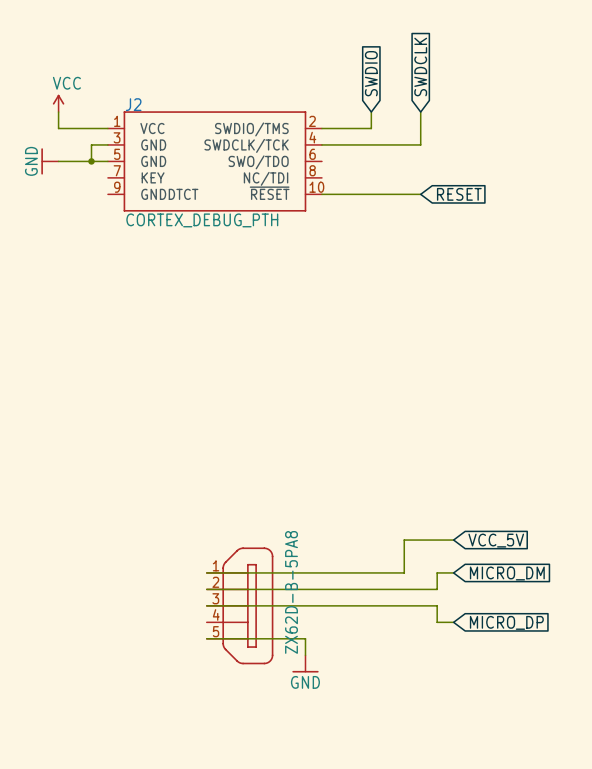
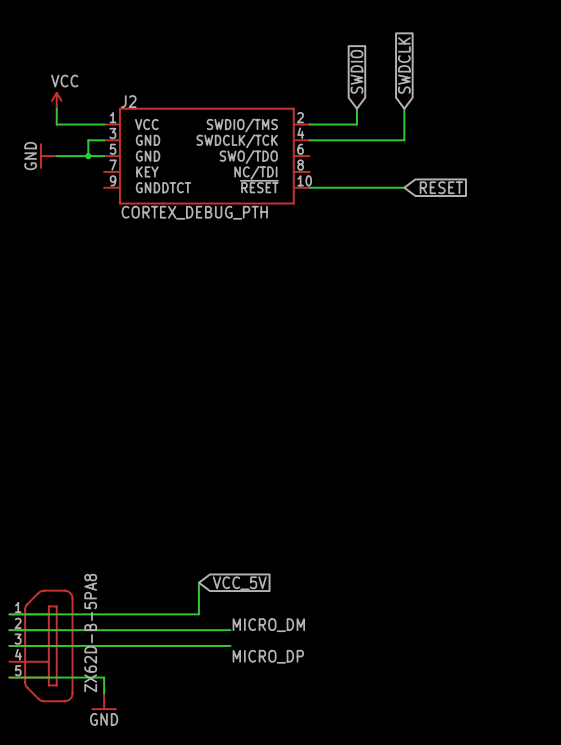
wire: (453, 540) (404, 540) (404, 572) (206, 572) -> none
global label: VCC_5V (496, 540) -> none
wire: (453, 572) (437, 572) (437, 589) (206, 589) -> none
global label: MICRO_DM (507, 573) -> none
wire: (206, 605) (437, 605) (437, 622) (453, 622) -> (198, 582) (198, 614) (9, 614)
part: ZX62D-B-5PA8 (240, 605) -> none
global label: none -> VCC_5V (239, 583)
global label: MICRO_DP (506, 622) -> none
wire: (206, 638) (305, 638) (305, 655) -> none
label: none -> MICRO_DM (268, 625)
wire: none -> (9, 630) (230, 630)
power symbol: GND (305, 663) -> none
wire: none -> (9, 645) (230, 645)
part: none -> ZX62D-B-5PA8 (41, 645)
label: none -> MICRO_DP (268, 656)
wire: none -> (9, 677) (104, 677) (104, 693)
power symbol: none -> GND (104, 701)

